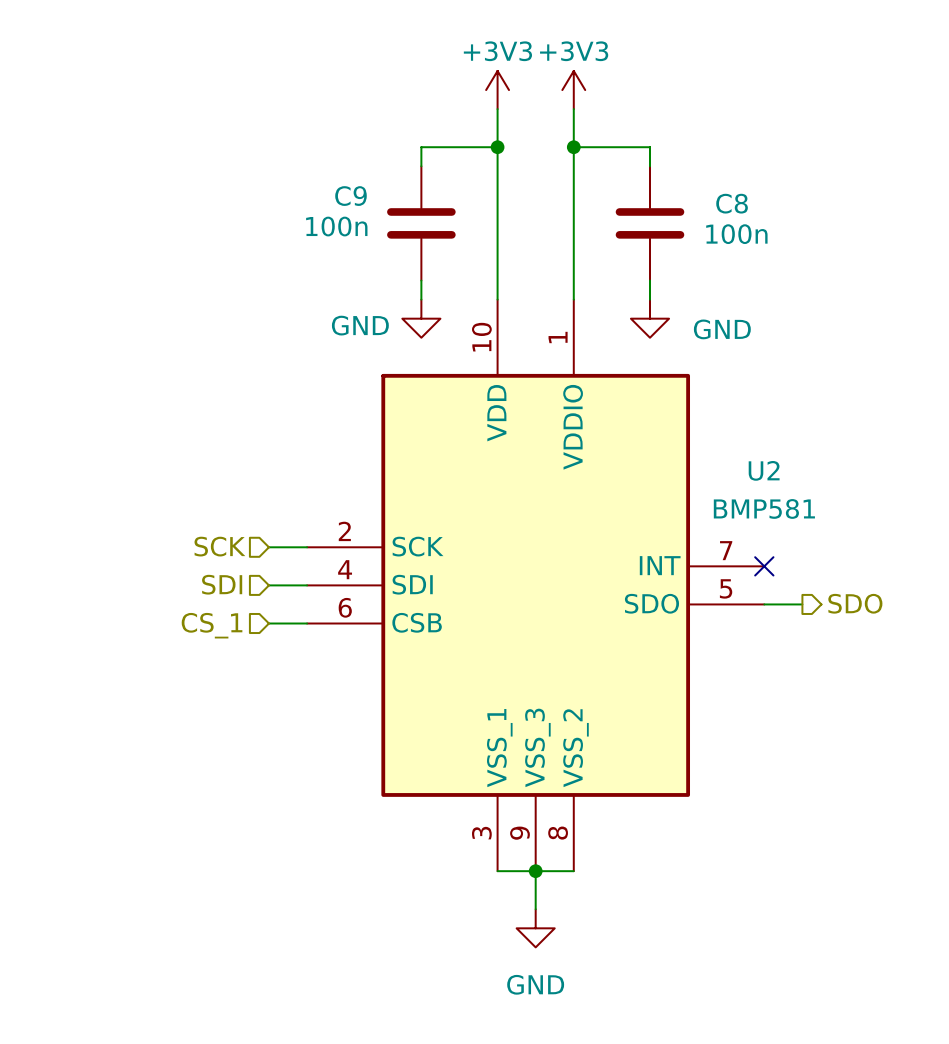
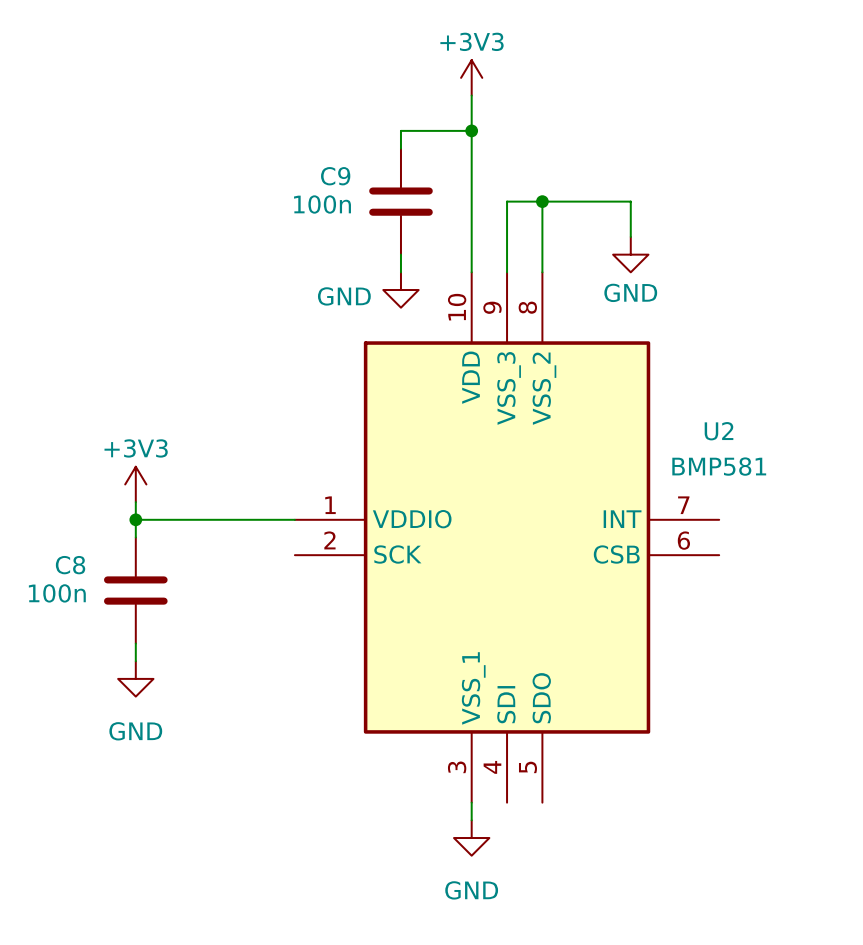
power symbol: +3V3 (573, 90) -> none
wire: (573, 109) (573, 223) -> none
wire: (573, 147) (649, 147) (649, 166) -> none
junction position: (573, 147) -> (542, 201)
C8 name position: C8 (732, 203) -> C8 (70, 565)
C8 position: (649, 223) -> (135, 590)
C8 value position: 100n (736, 234) -> 100n (57, 593)
wire: none -> (630, 236) (630, 201) (507, 201) (507, 272)
wire: (649, 280) (649, 299) -> none
U2 symbol: [307, 299, 765, 872] -> [294, 272, 720, 803]
power symbol position: GND (649, 318) -> GND (630, 254)
power symbol text position: GND (722, 329) -> GND (630, 292)
power symbol: none -> +3V3 (135, 484)
hierarchical label: SCK (219, 546) -> none
wire: none -> (135, 502) (135, 537)
wire: (268, 547) (307, 547) -> none
wire: none -> (135, 519) (294, 519)
junction: none -> (135, 519)
no-connect mark: (764, 566) -> none
hierarchical label: SDI (222, 584) -> none
wire: (268, 585) (307, 585) -> none
hierarchical label: SDO (855, 603) -> none
wire: (764, 604) (802, 604) -> none
wire: (268, 623) (307, 623) -> none
hierarchical label: CS_1 (212, 625) -> none
wire: none -> (135, 643) (135, 661)
power symbol: none -> GND (135, 678)
wire: (497, 871) (573, 871) -> (471, 802) (471, 820)
wire: (535, 871) (535, 909) -> none
junction: (535, 871) -> none
power symbol position: GND (535, 928) -> GND (471, 838)

